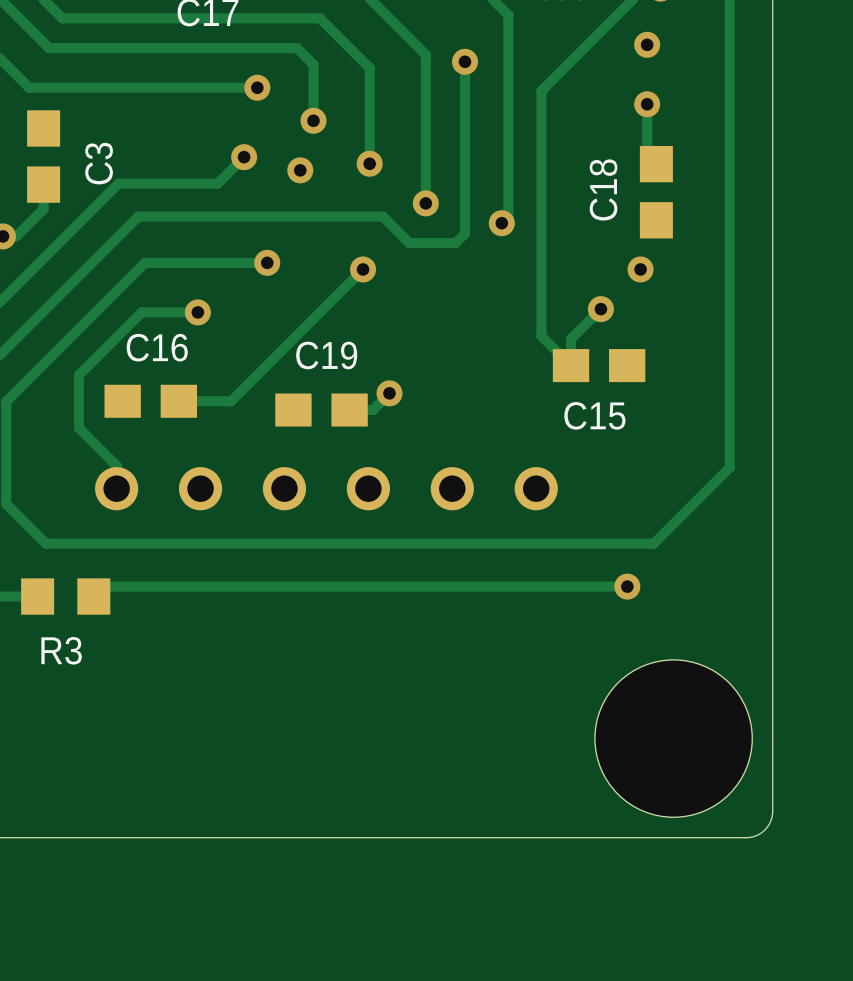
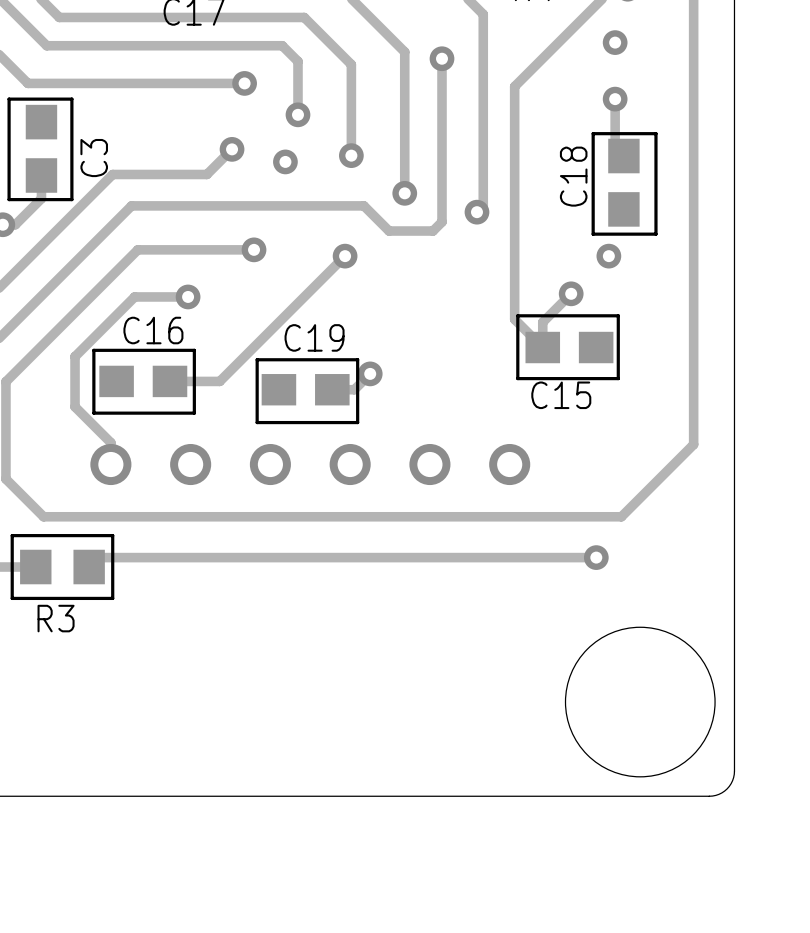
line: none -> (71, 99) (71, 199) (9, 199) (9, 99) (71, 99)
line: none -> (655, 133) (655, 234) (593, 234) (593, 133) (655, 133)
line: none -> (618, 315) (517, 315) (517, 378) (618, 378) (618, 315)
line: none -> (194, 350) (93, 350) (93, 413) (194, 413) (194, 350)
line: none -> (357, 359) (257, 359) (257, 422) (357, 422) (357, 359)
line: none -> (112, 535) (12, 535) (12, 598) (112, 598) (112, 535)

